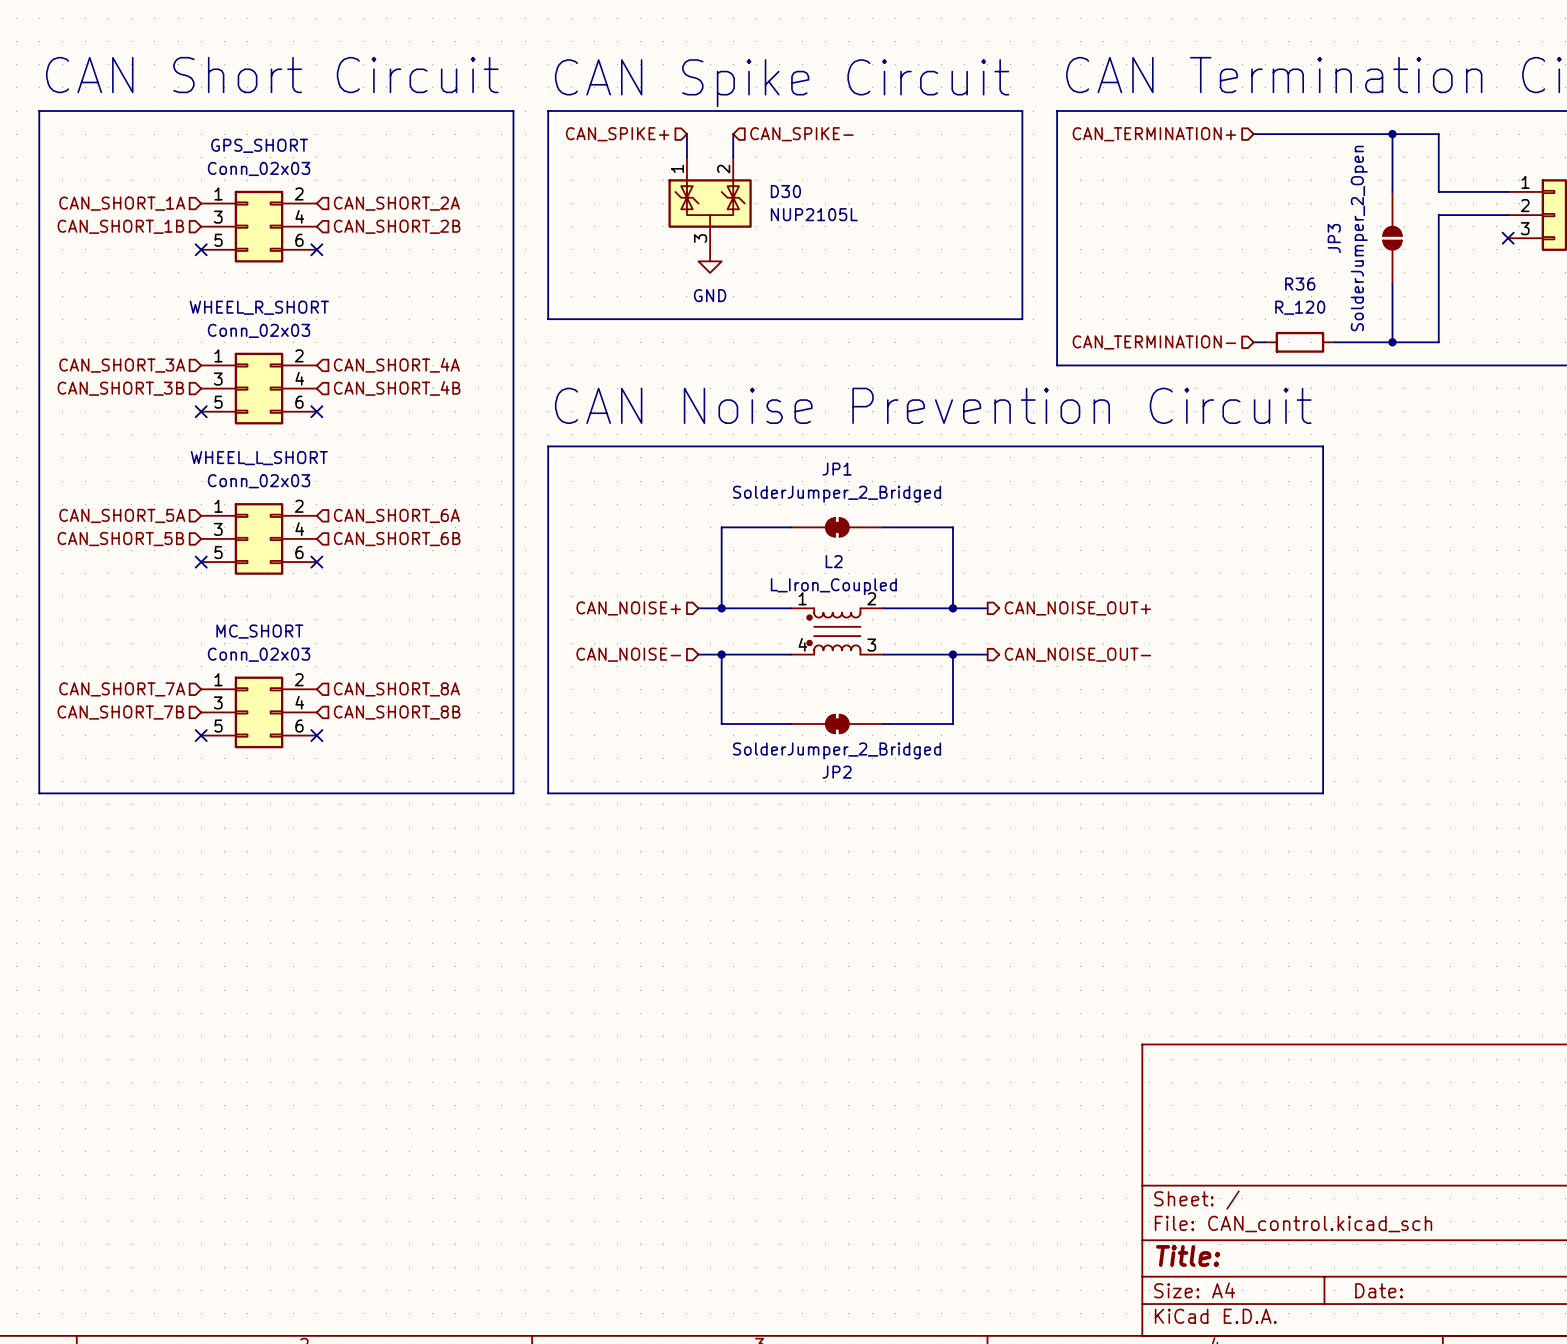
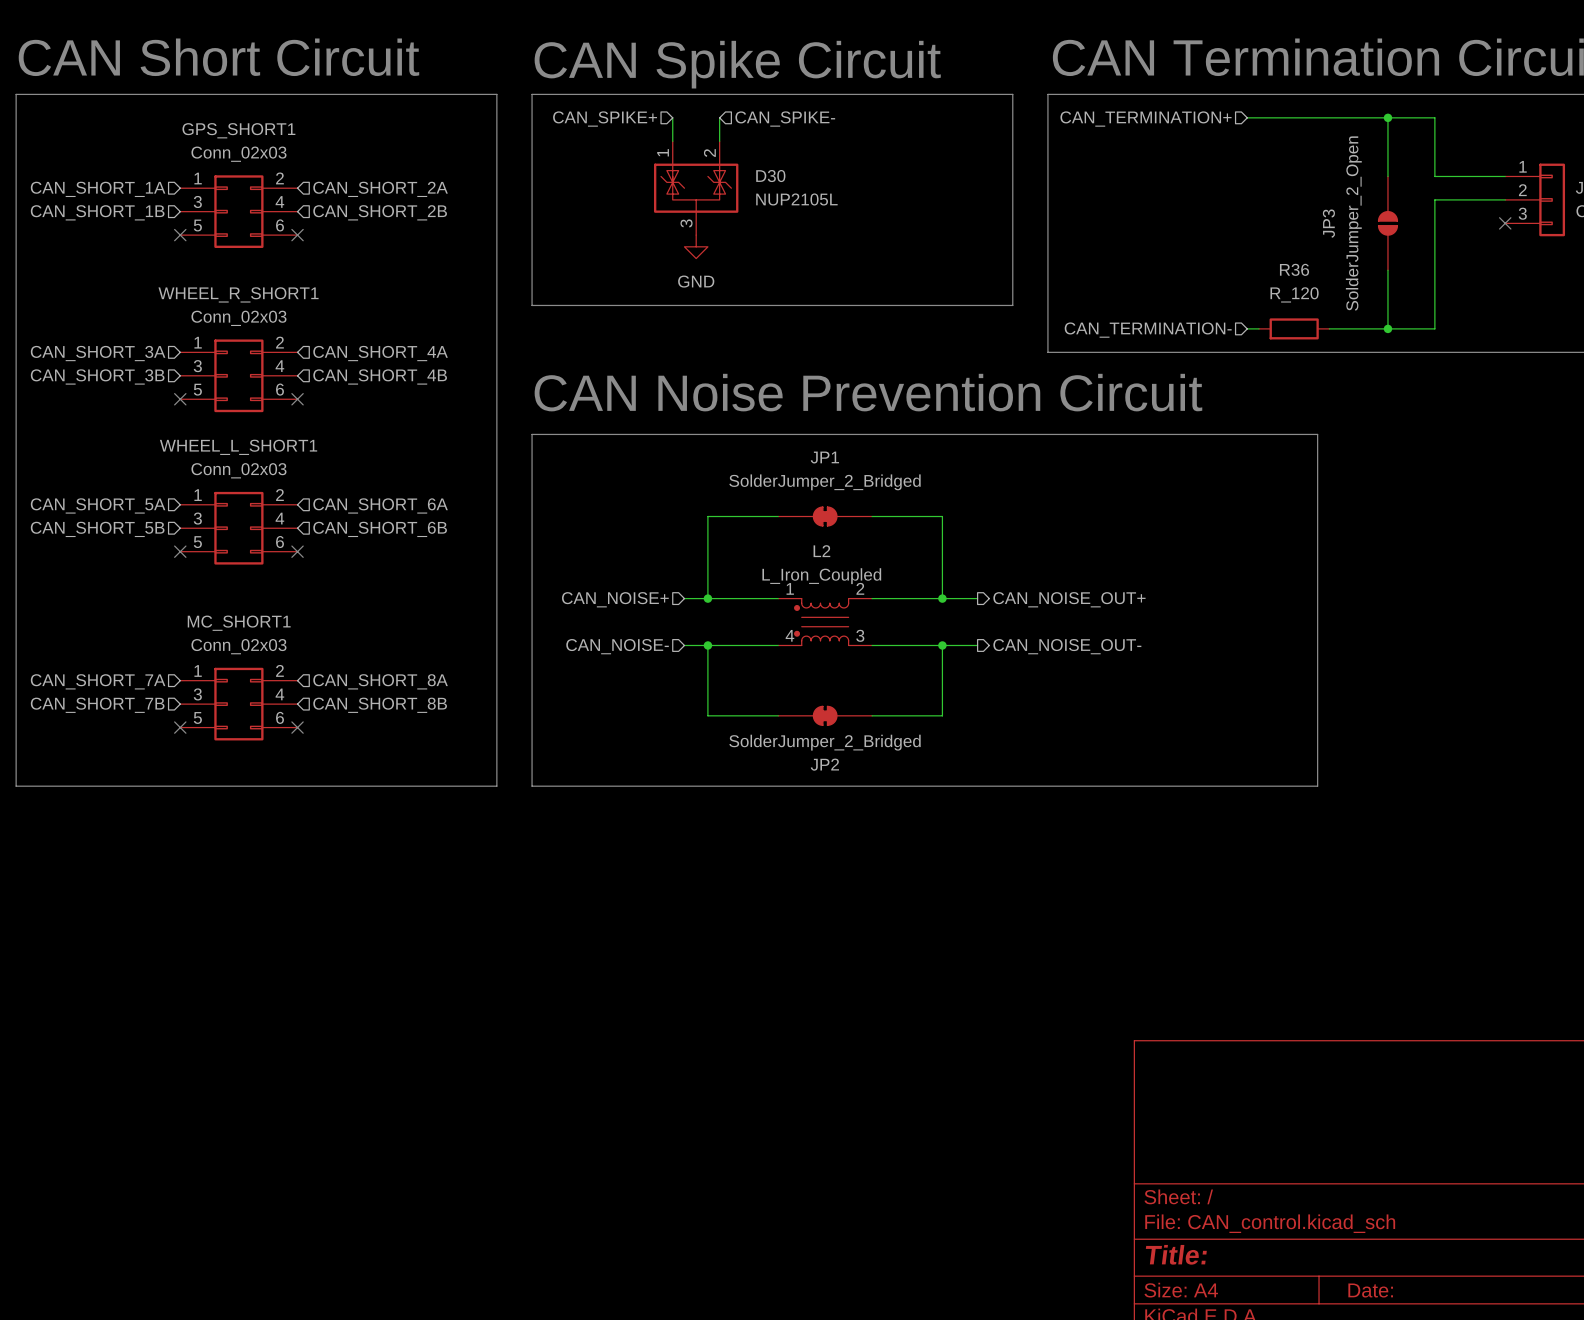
GPS_SHORT name: GPS_SHORT (259, 145) -> GPS_SHORT1 (238, 130)
WHEEL_R_SHORT name: WHEEL_R_SHORT (259, 307) -> WHEEL_R_SHORT1 (238, 294)
WHEEL_L_SHORT name: WHEEL_L_SHORT (259, 458) -> WHEEL_L_SHORT1 (238, 447)
MC_SHORT name: MC_SHORT (259, 631) -> MC_SHORT1 (239, 623)

